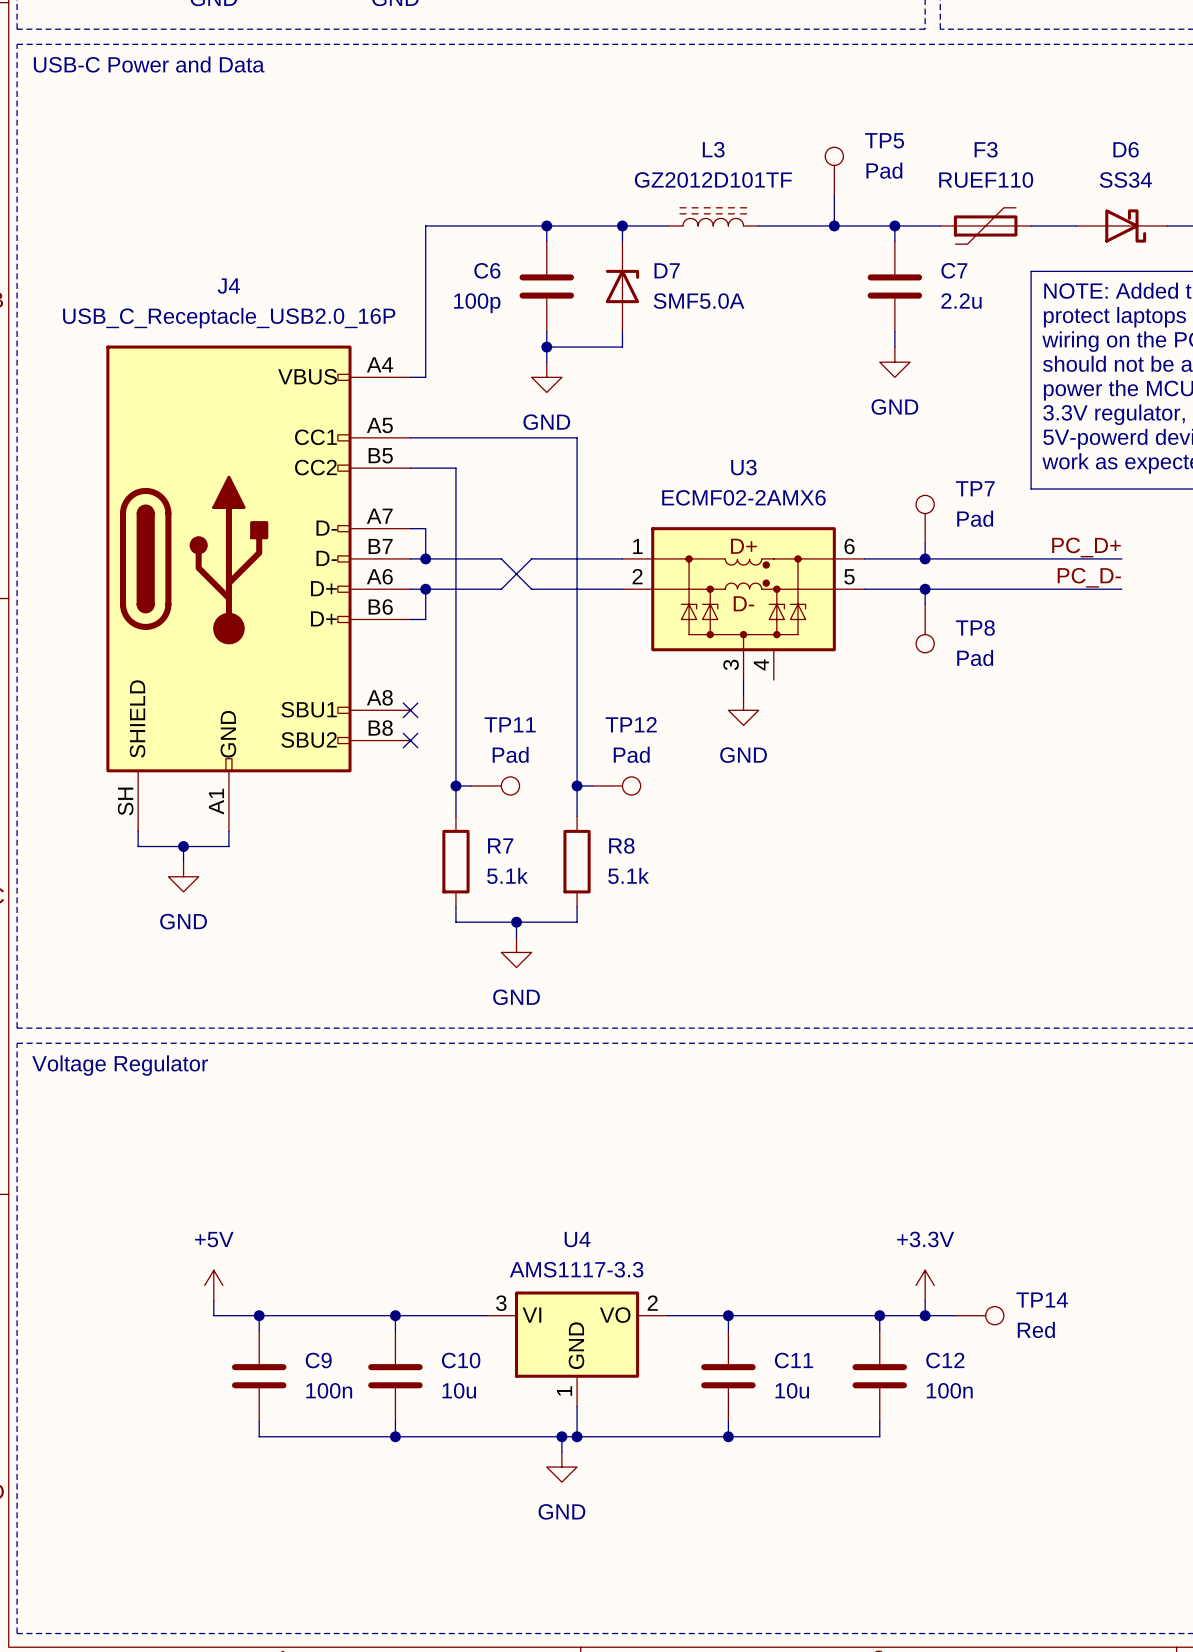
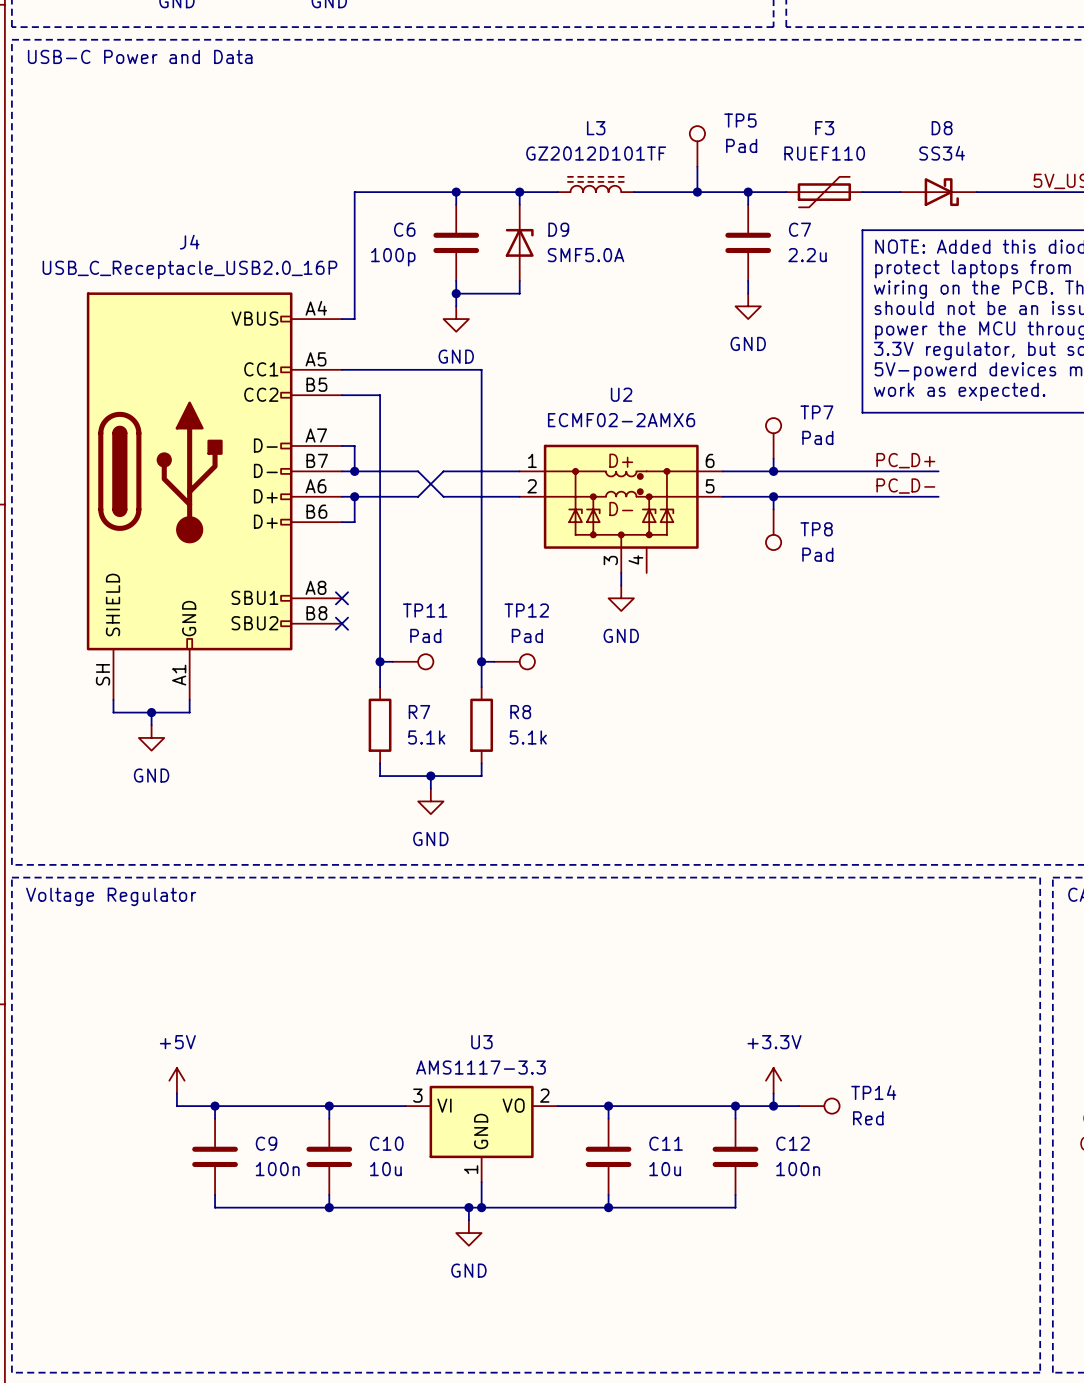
D6 name: D6 (1126, 149) -> D8 (942, 128)
D7 name: D7 (667, 270) -> D9 (558, 229)
U3 name: U3 (743, 467) -> U2 (621, 394)
U4 name: U4 (577, 1239) -> U3 (481, 1042)

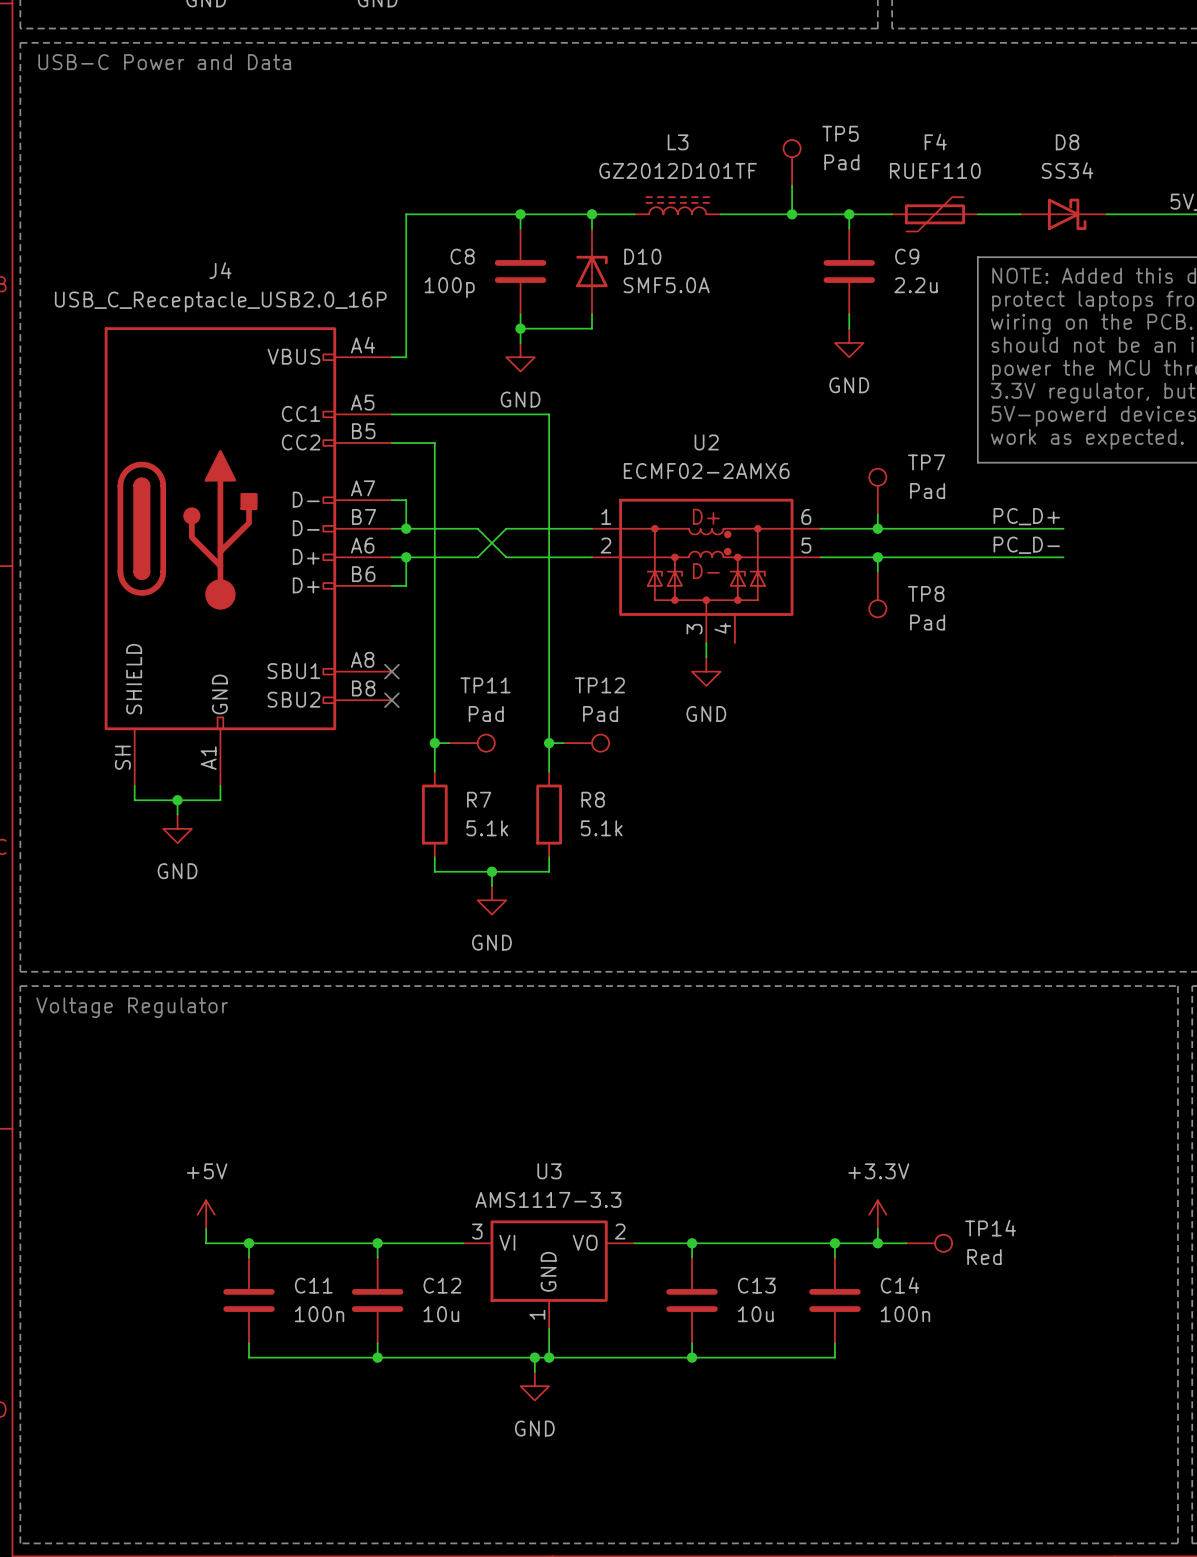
F3 name: F3 (824, 128) -> F4 (935, 142)
C6 name: C6 (404, 229) -> C8 (462, 256)
D9 name: D9 (558, 229) -> D10 (642, 256)
C7 name: C7 (799, 229) -> C9 (907, 256)
C9 name: C9 (266, 1143) -> C11 (313, 1285)
C10 name: C10 (386, 1143) -> C12 (442, 1285)
C11 name: C11 (666, 1143) -> C13 (756, 1285)
C12 name: C12 (793, 1143) -> C14 (900, 1285)

